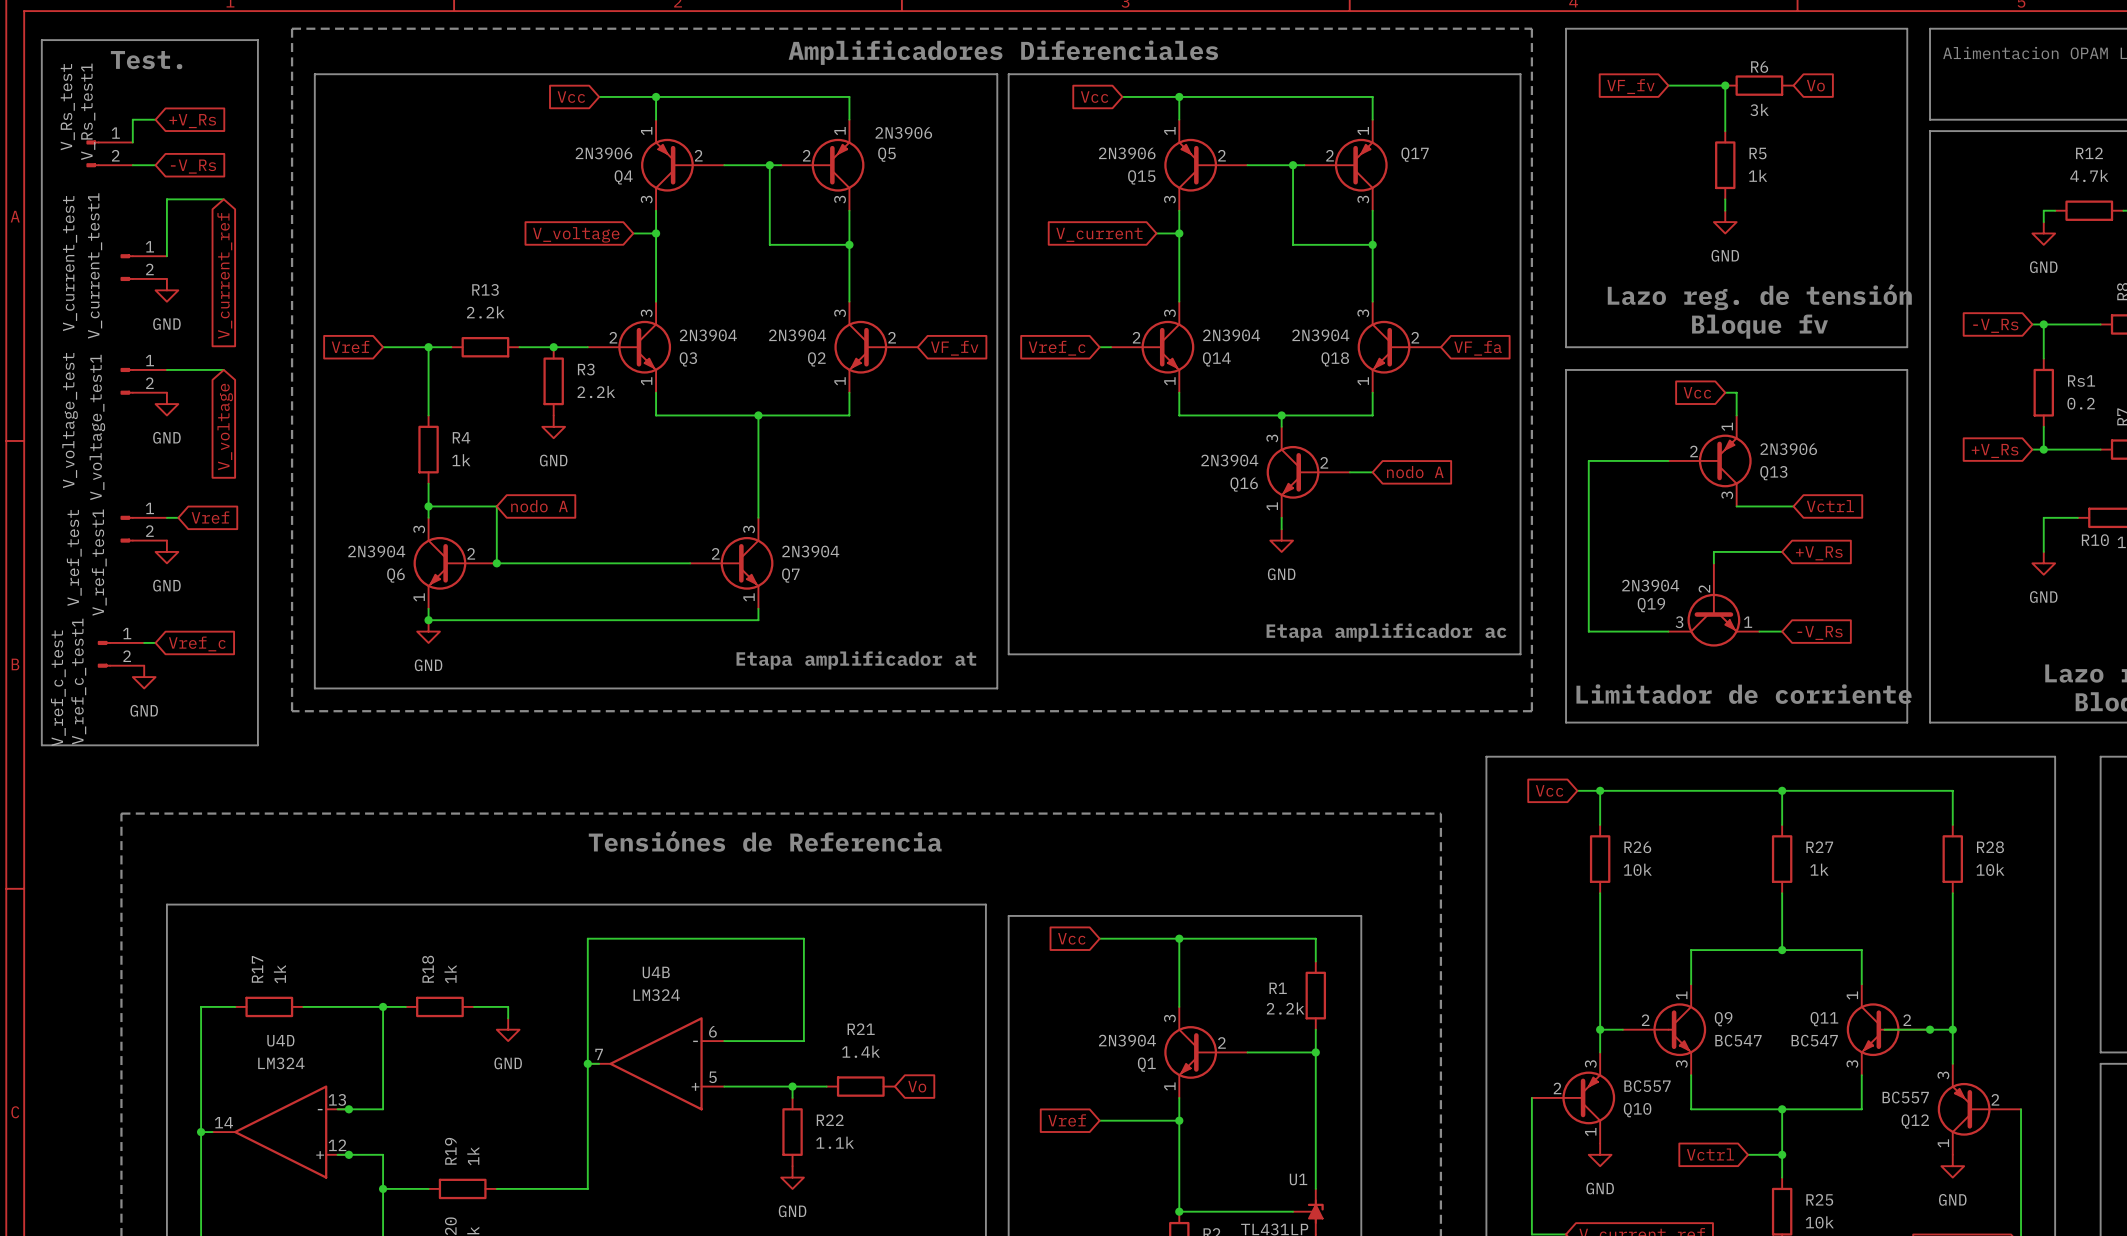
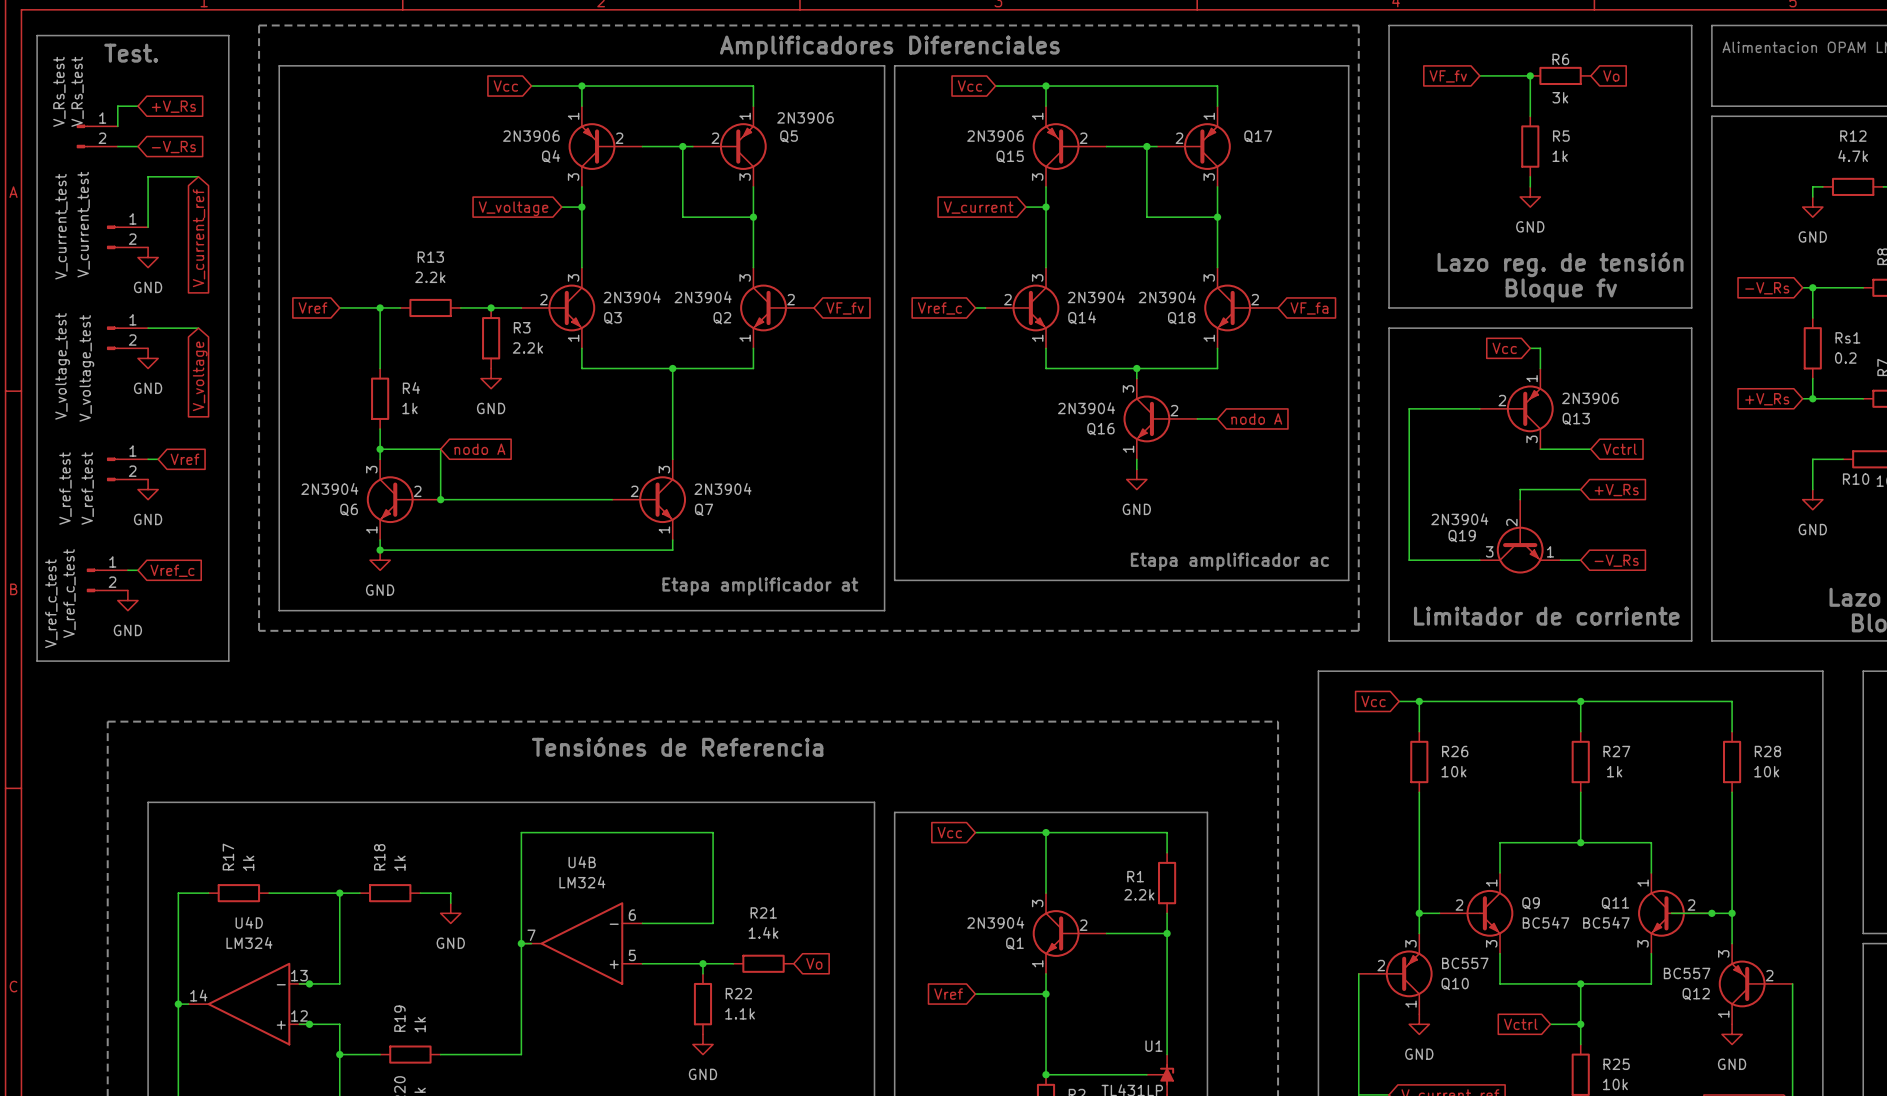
V_Rs_test1 name: V_Rs_test1 (88, 111) -> V_Rs_test (77, 91)
V_current_test1 name: V_current_test1 (95, 265) -> V_current_test (83, 224)
V_voltage_test1 name: V_voltage_test1 (97, 427) -> V_voltage_test (86, 368)
V_ref_test1 name: V_ref_test1 (99, 562) -> V_ref_test (87, 488)
V_ref_c_test1 name: V_ref_c_test1 (78, 681) -> V_ref_c_test (69, 593)

